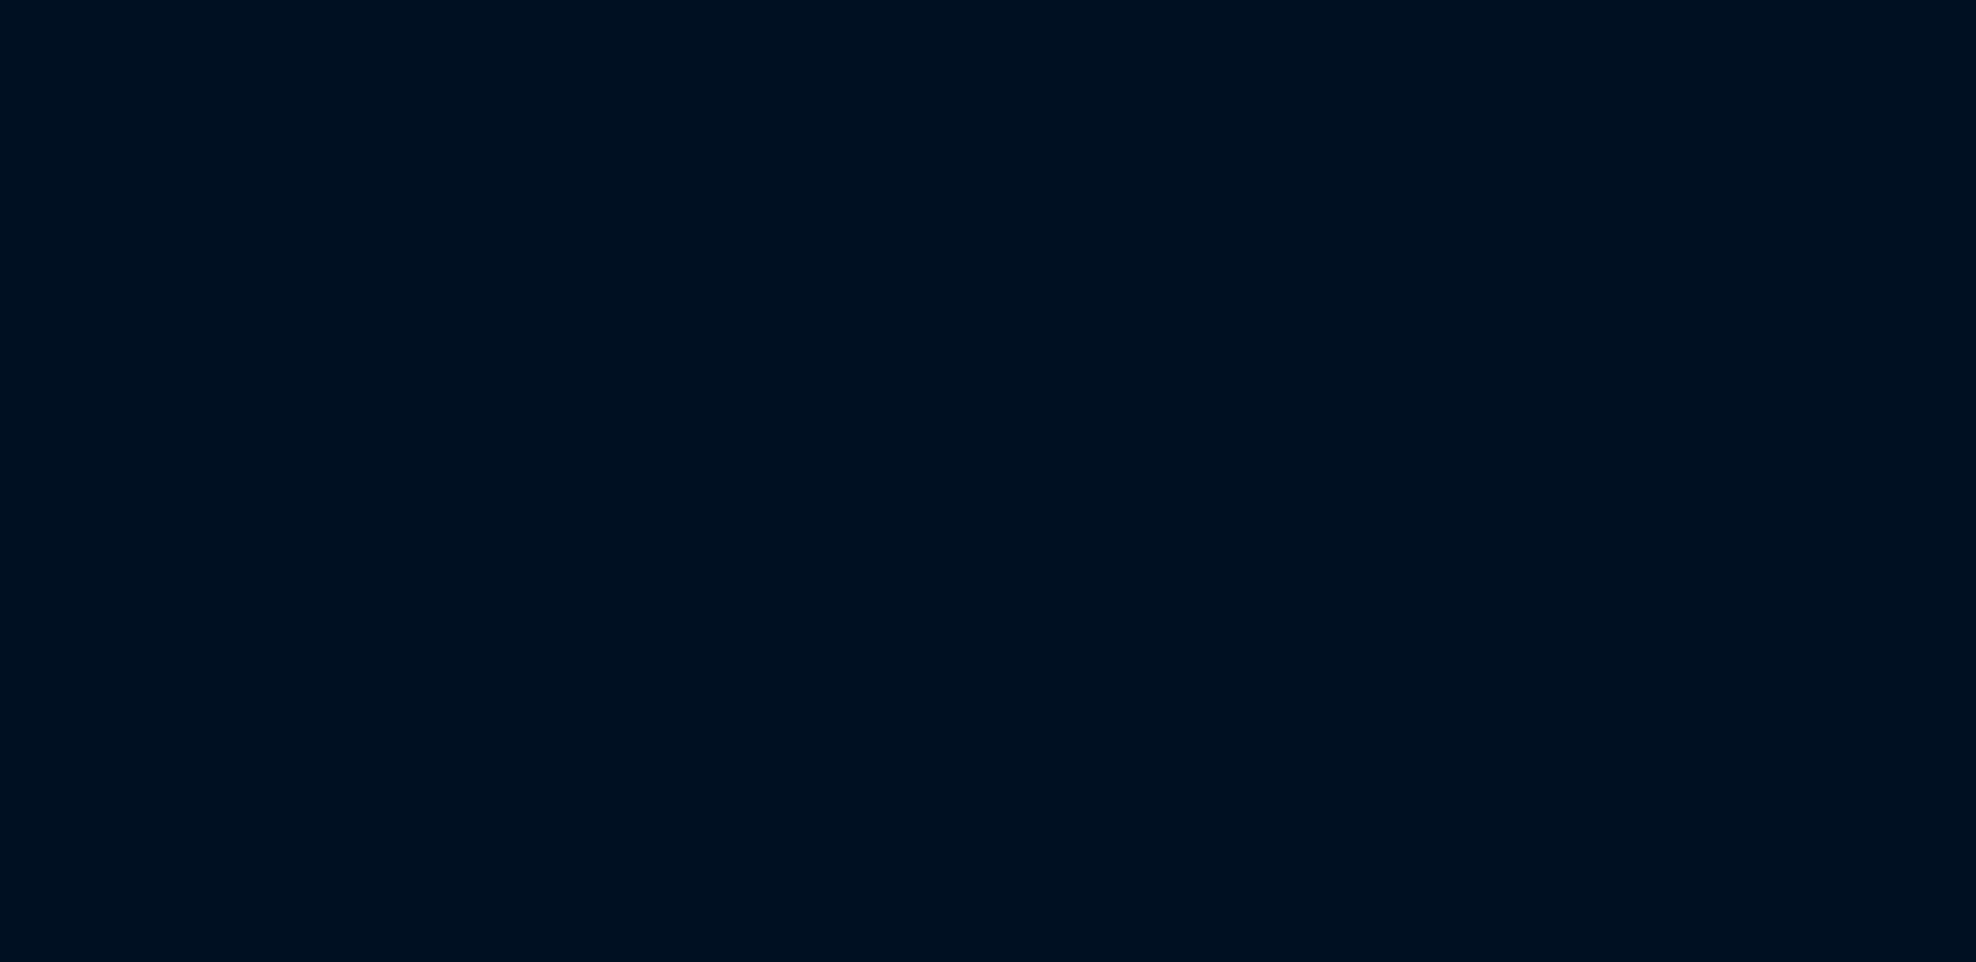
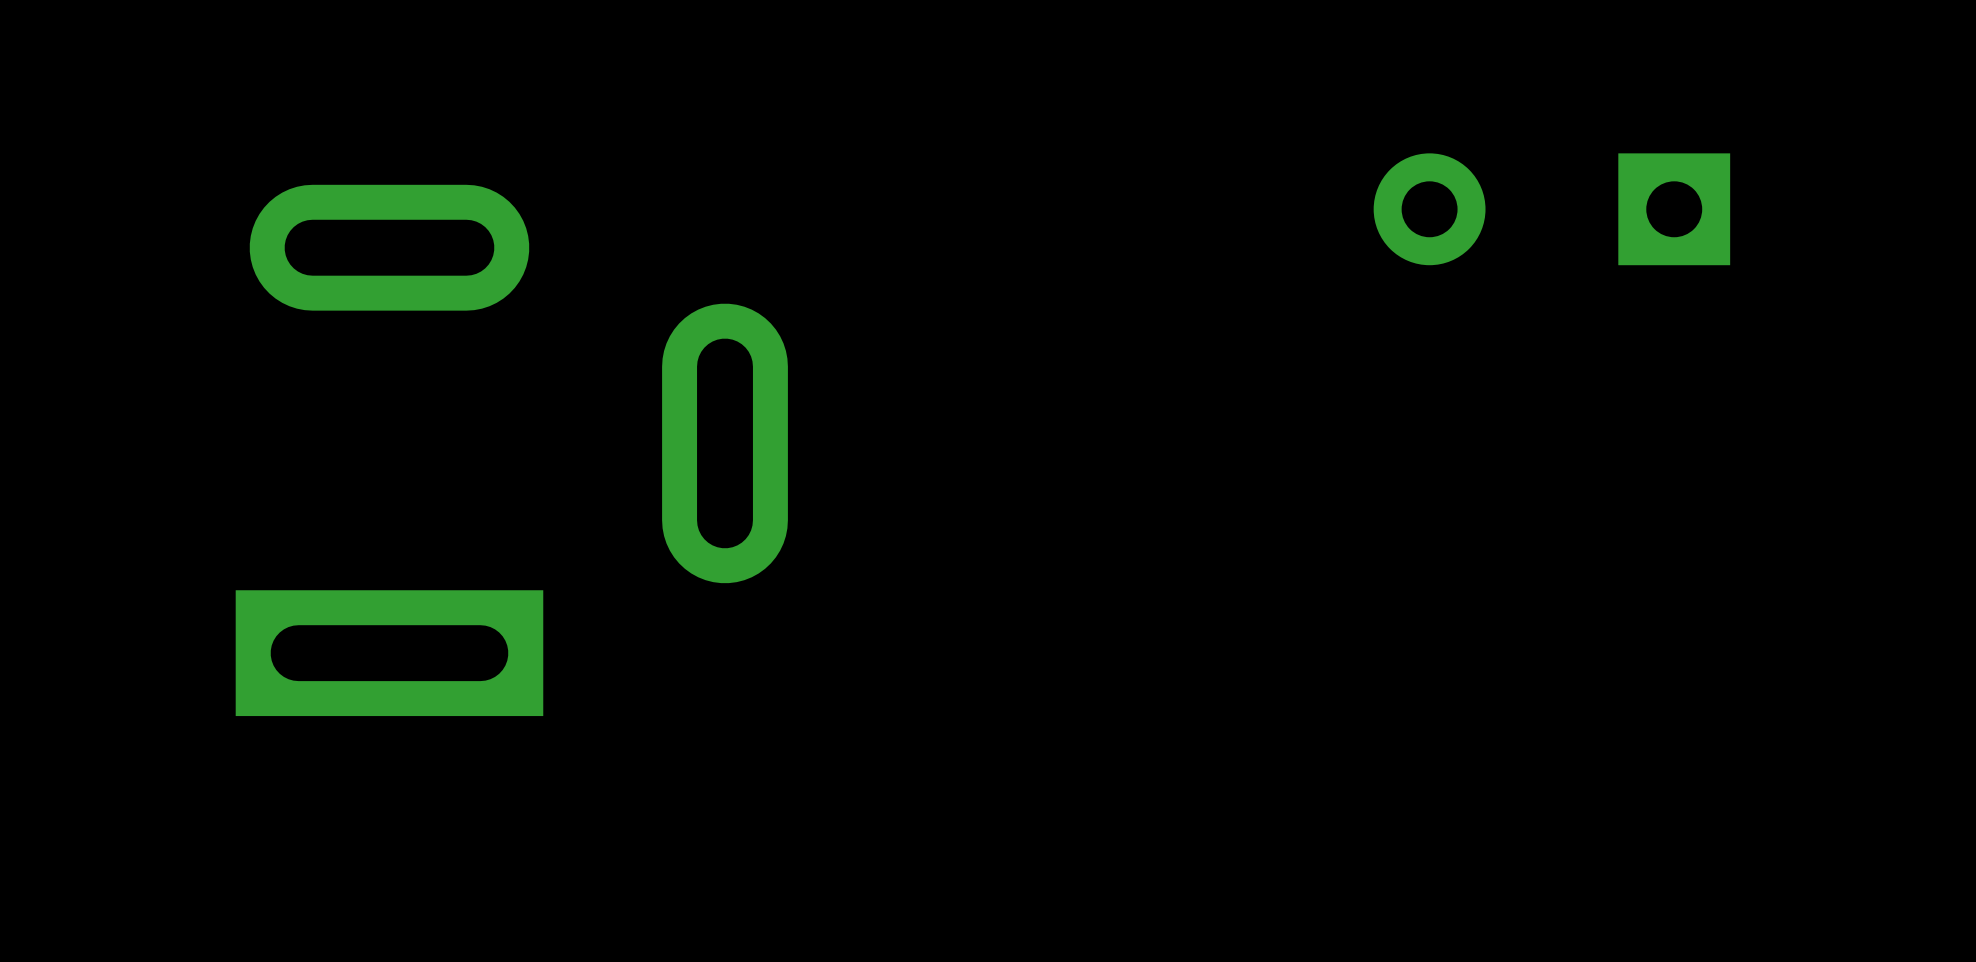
part: none -> (1551, 209)
part: none -> (511, 450)

